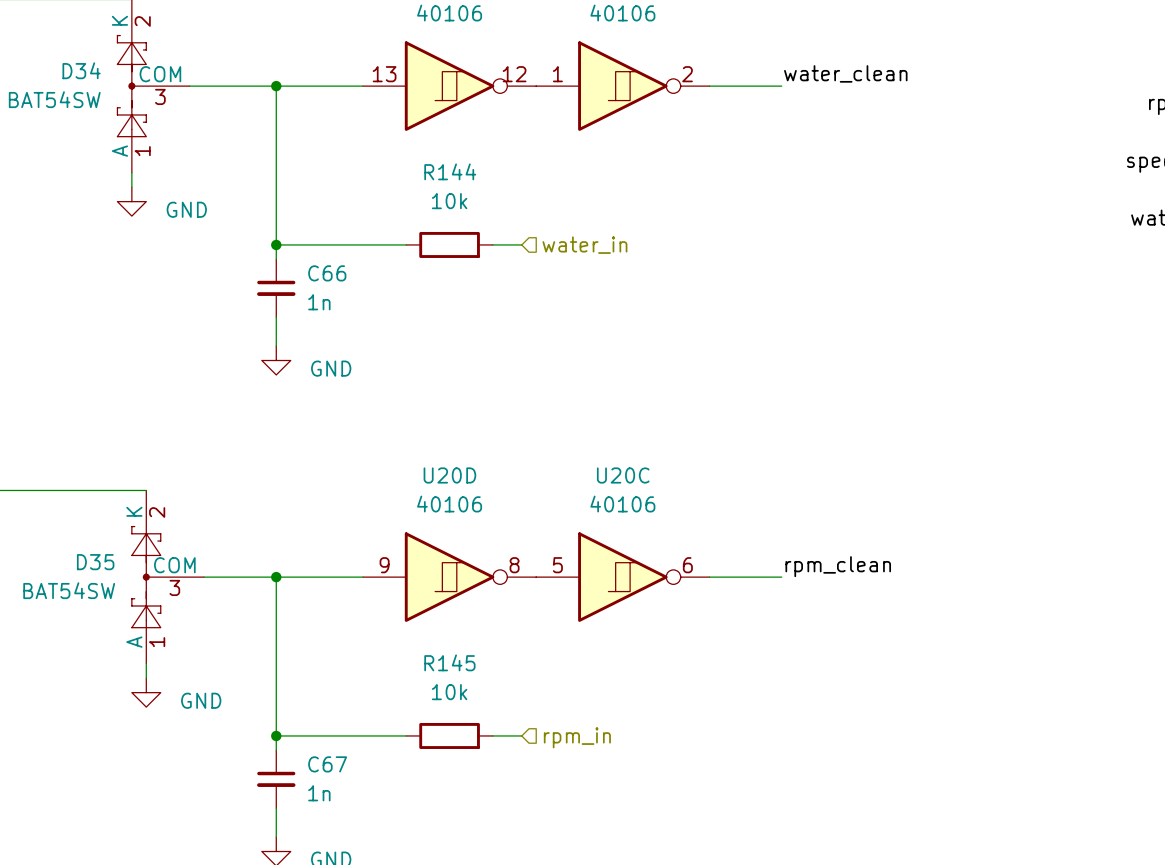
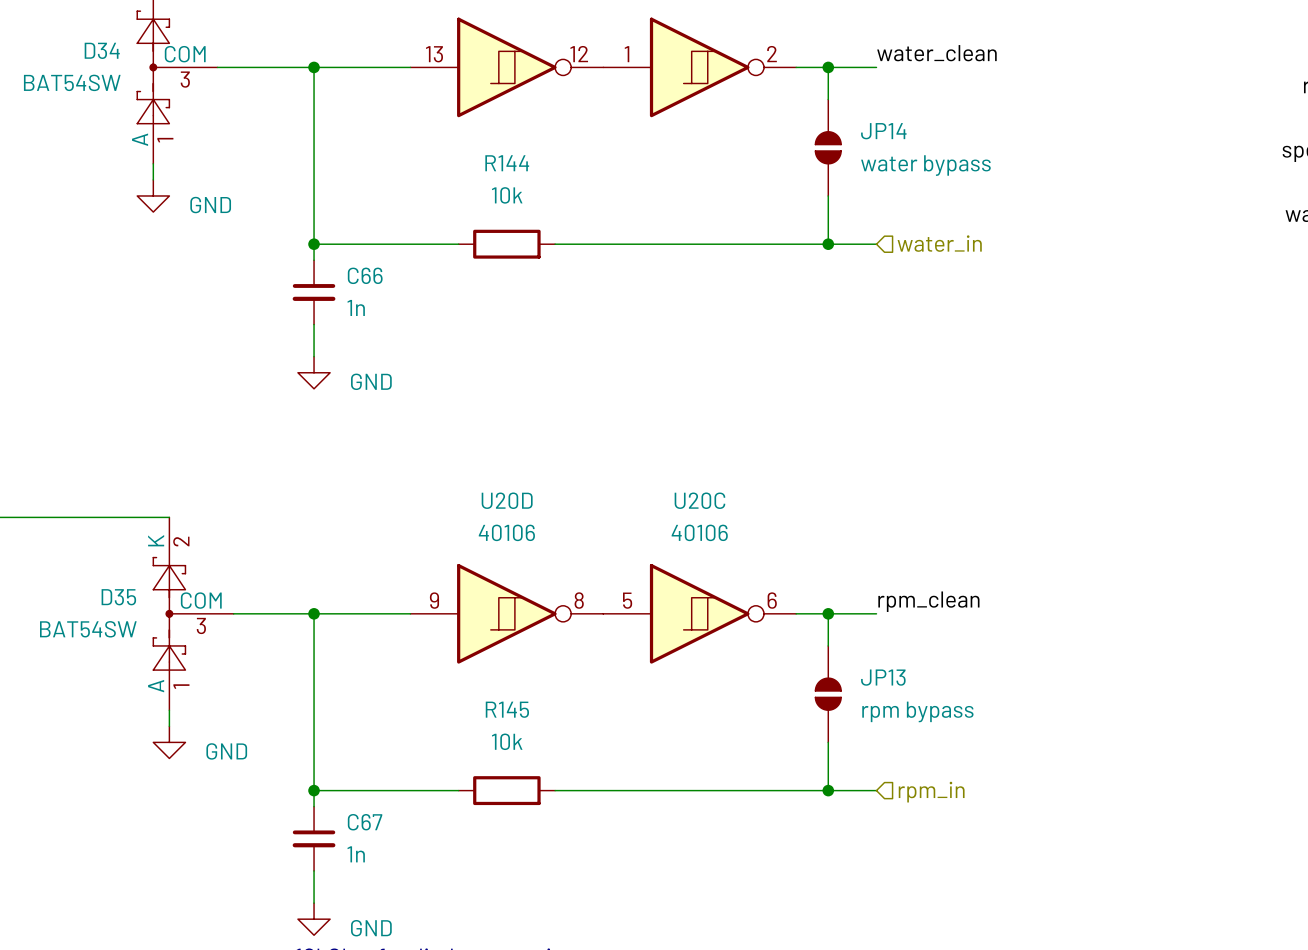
wire: none -> (828, 67) (828, 99)
junction: none -> (828, 67)
JP14: none -> water bypass (828, 147)
wire: none -> (828, 195) (828, 244)
wire: none -> (587, 244) (876, 244)
junction: none -> (828, 244)
hierarchical label position: water_in (584, 245) -> water_in (939, 243)
wire: none -> (828, 613) (828, 645)
junction: none -> (828, 613)
JP13: none -> rpm bypass (828, 694)
wire: none -> (828, 742) (828, 790)
wire: none -> (587, 790) (876, 790)
junction: none -> (828, 790)
hierarchical label position: rpm_in (577, 737) -> rpm_in (931, 792)

